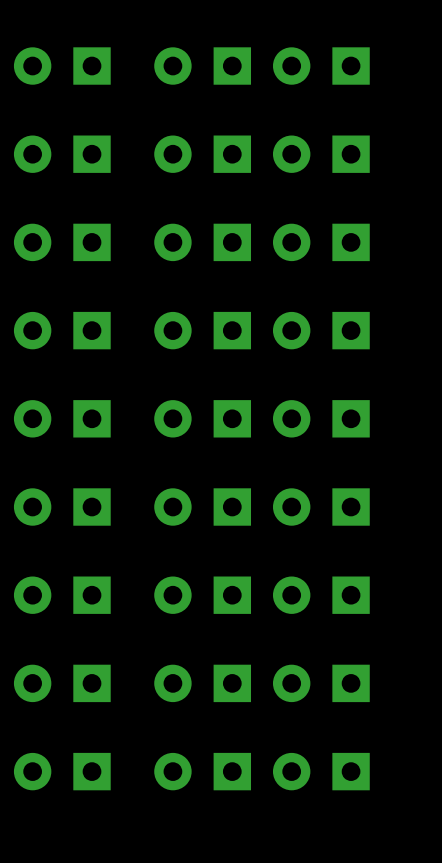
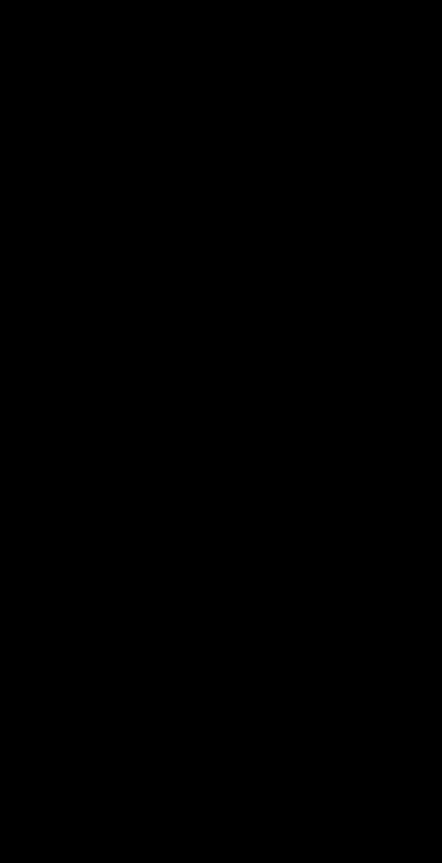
part: (62, 66) -> none
part: (202, 66) -> none
part: (321, 66) -> none
part: (62, 154) -> none
part: (202, 154) -> none
part: (321, 154) -> none
part: (62, 242) -> none
part: (202, 242) -> none
part: (321, 242) -> none
part: (62, 330) -> none
part: (202, 330) -> none
part: (321, 330) -> none
part: (62, 418) -> none
part: (202, 418) -> none
part: (321, 418) -> none
part: (62, 507) -> none
part: (202, 507) -> none
part: (321, 507) -> none
part: (62, 595) -> none
part: (202, 595) -> none
part: (321, 595) -> none
part: (62, 683) -> none
part: (202, 683) -> none
part: (321, 683) -> none
part: (62, 771) -> none
part: (202, 771) -> none
part: (321, 771) -> none

